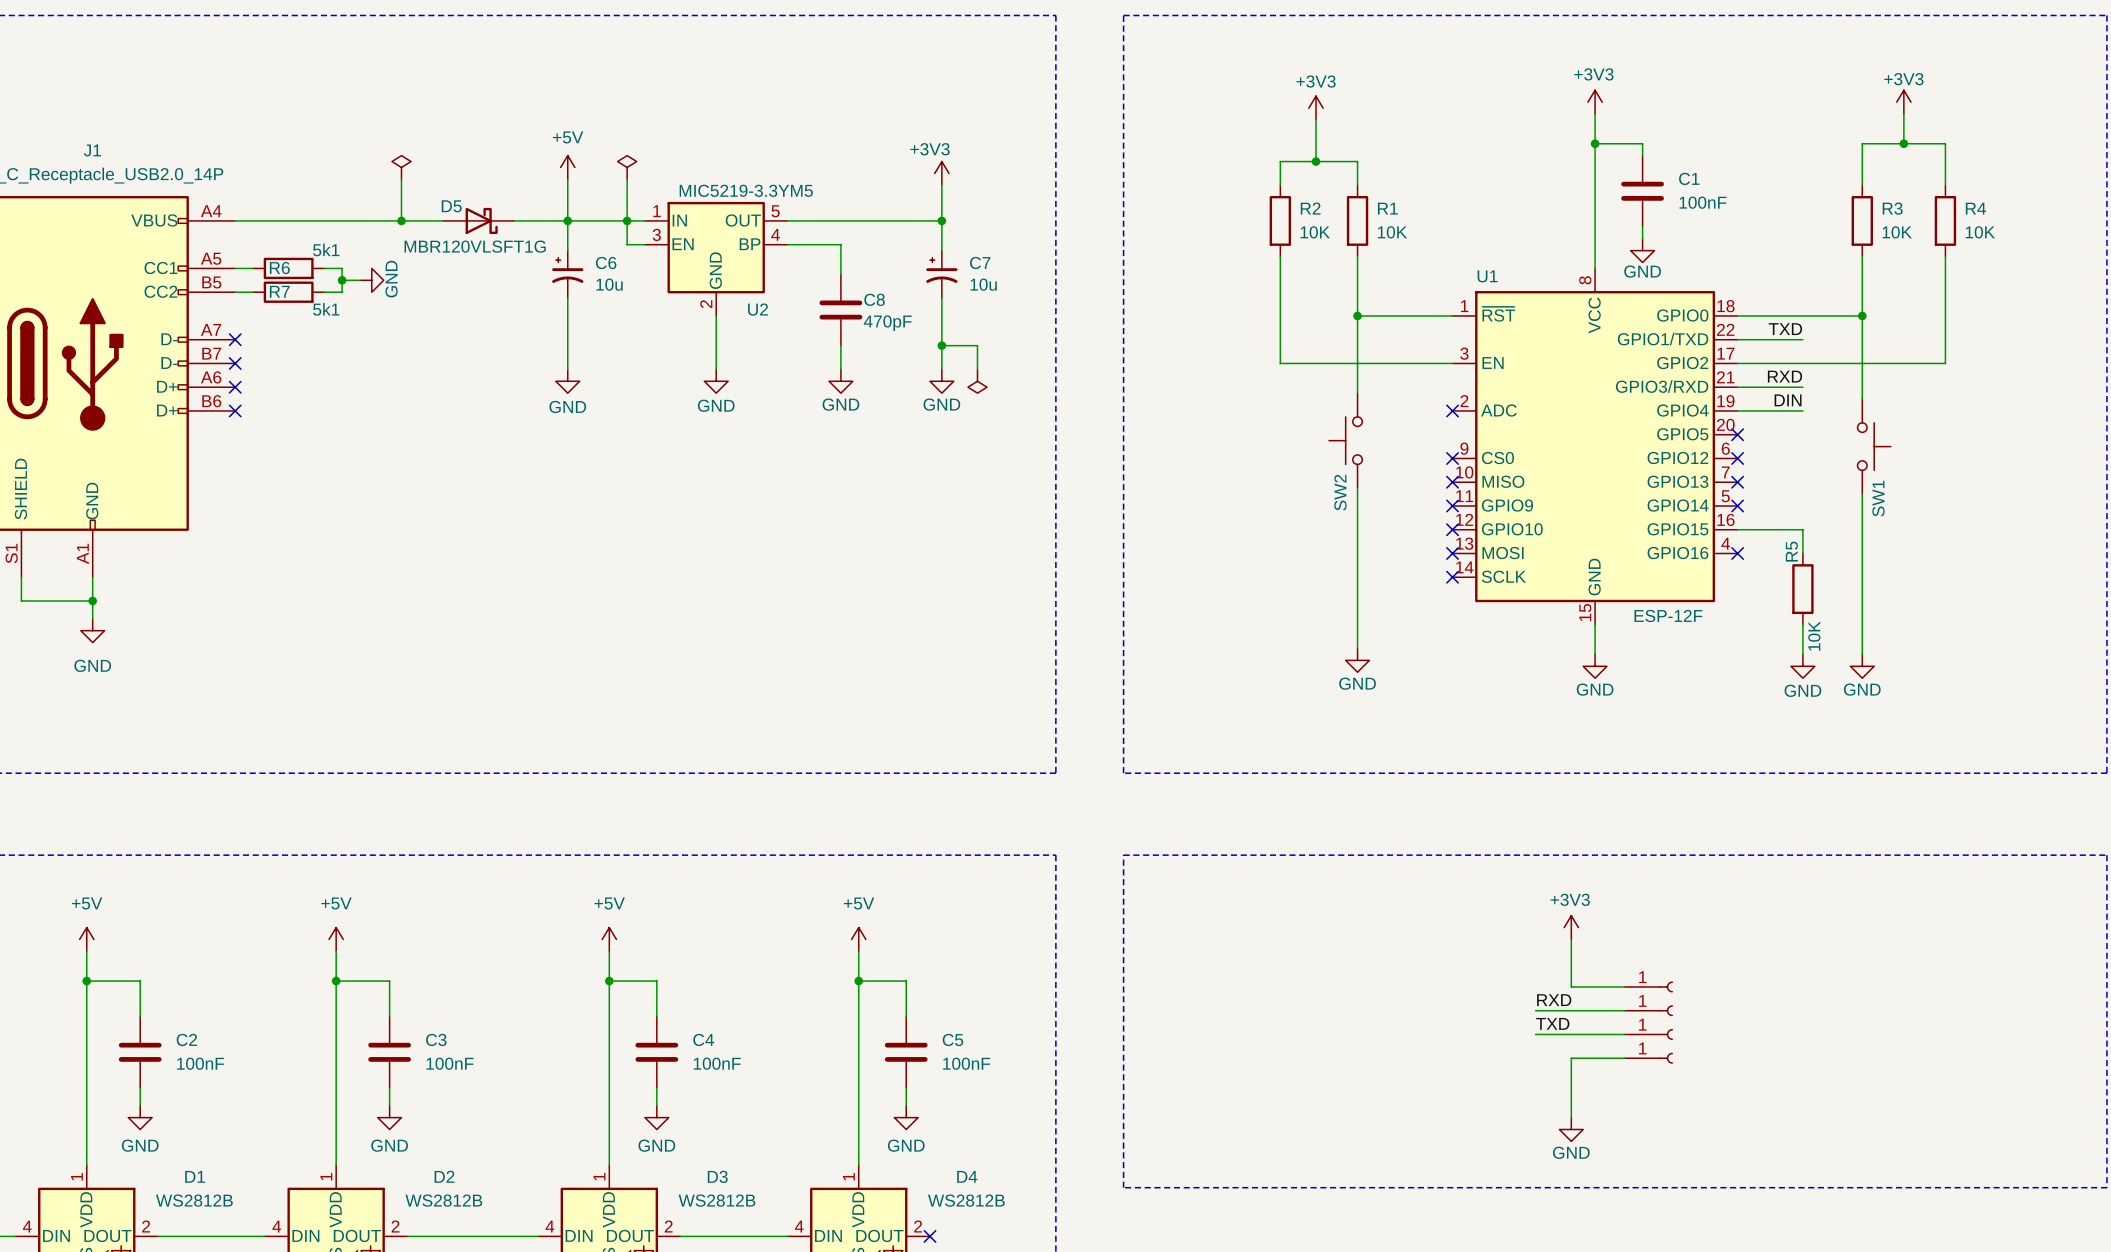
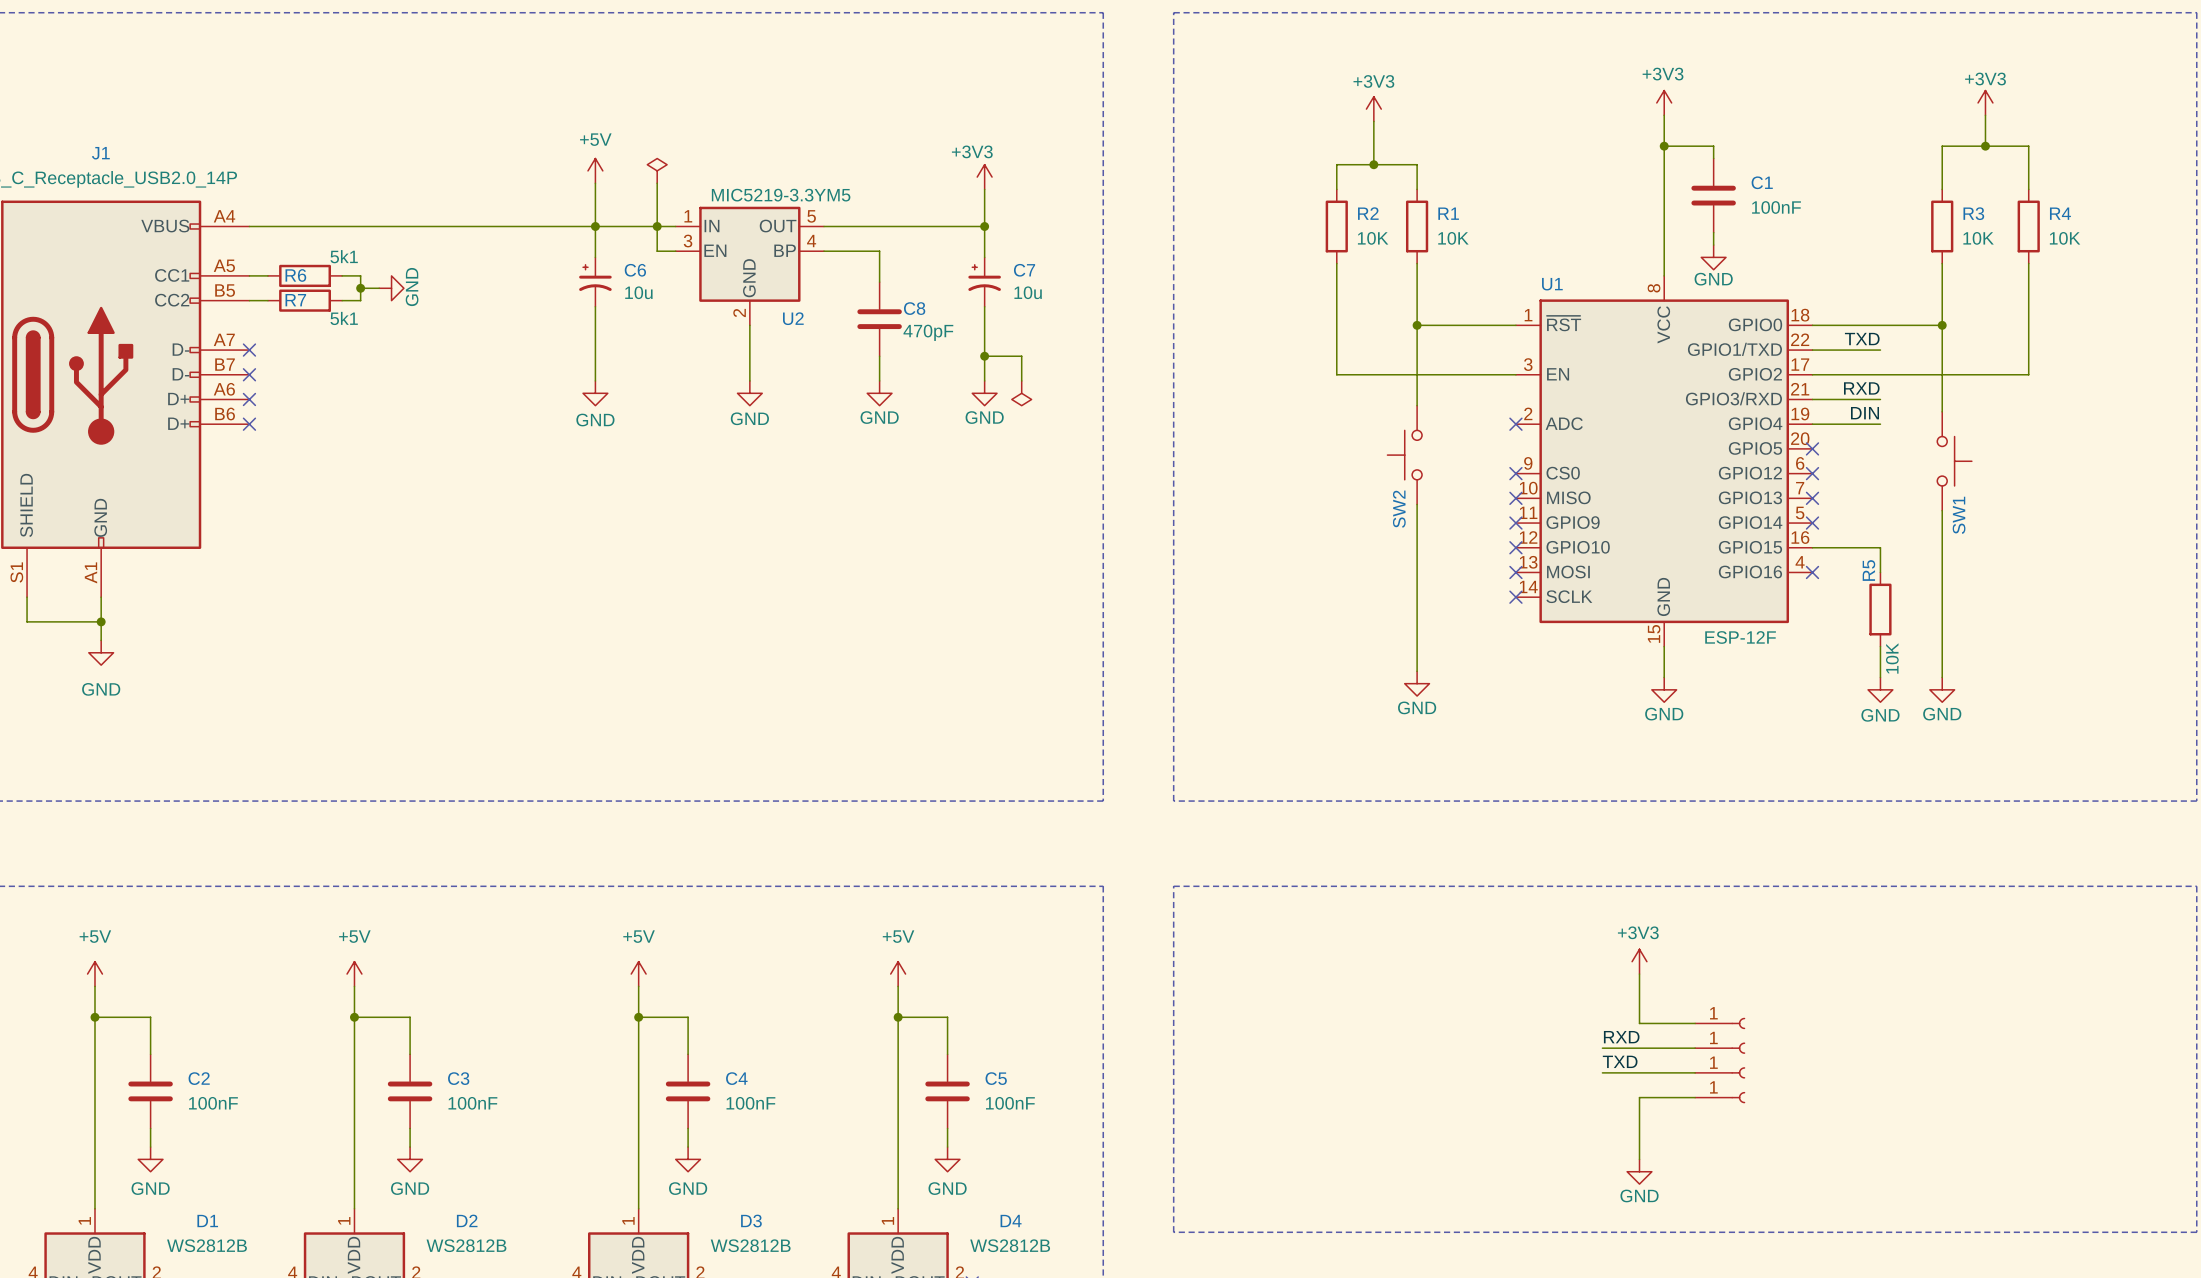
power symbol: (401, 167) -> none
wire: (401, 179) (401, 220) -> none
junction: (401, 220) -> none
D5: MBR120VLSFT1G (478, 220) -> none

